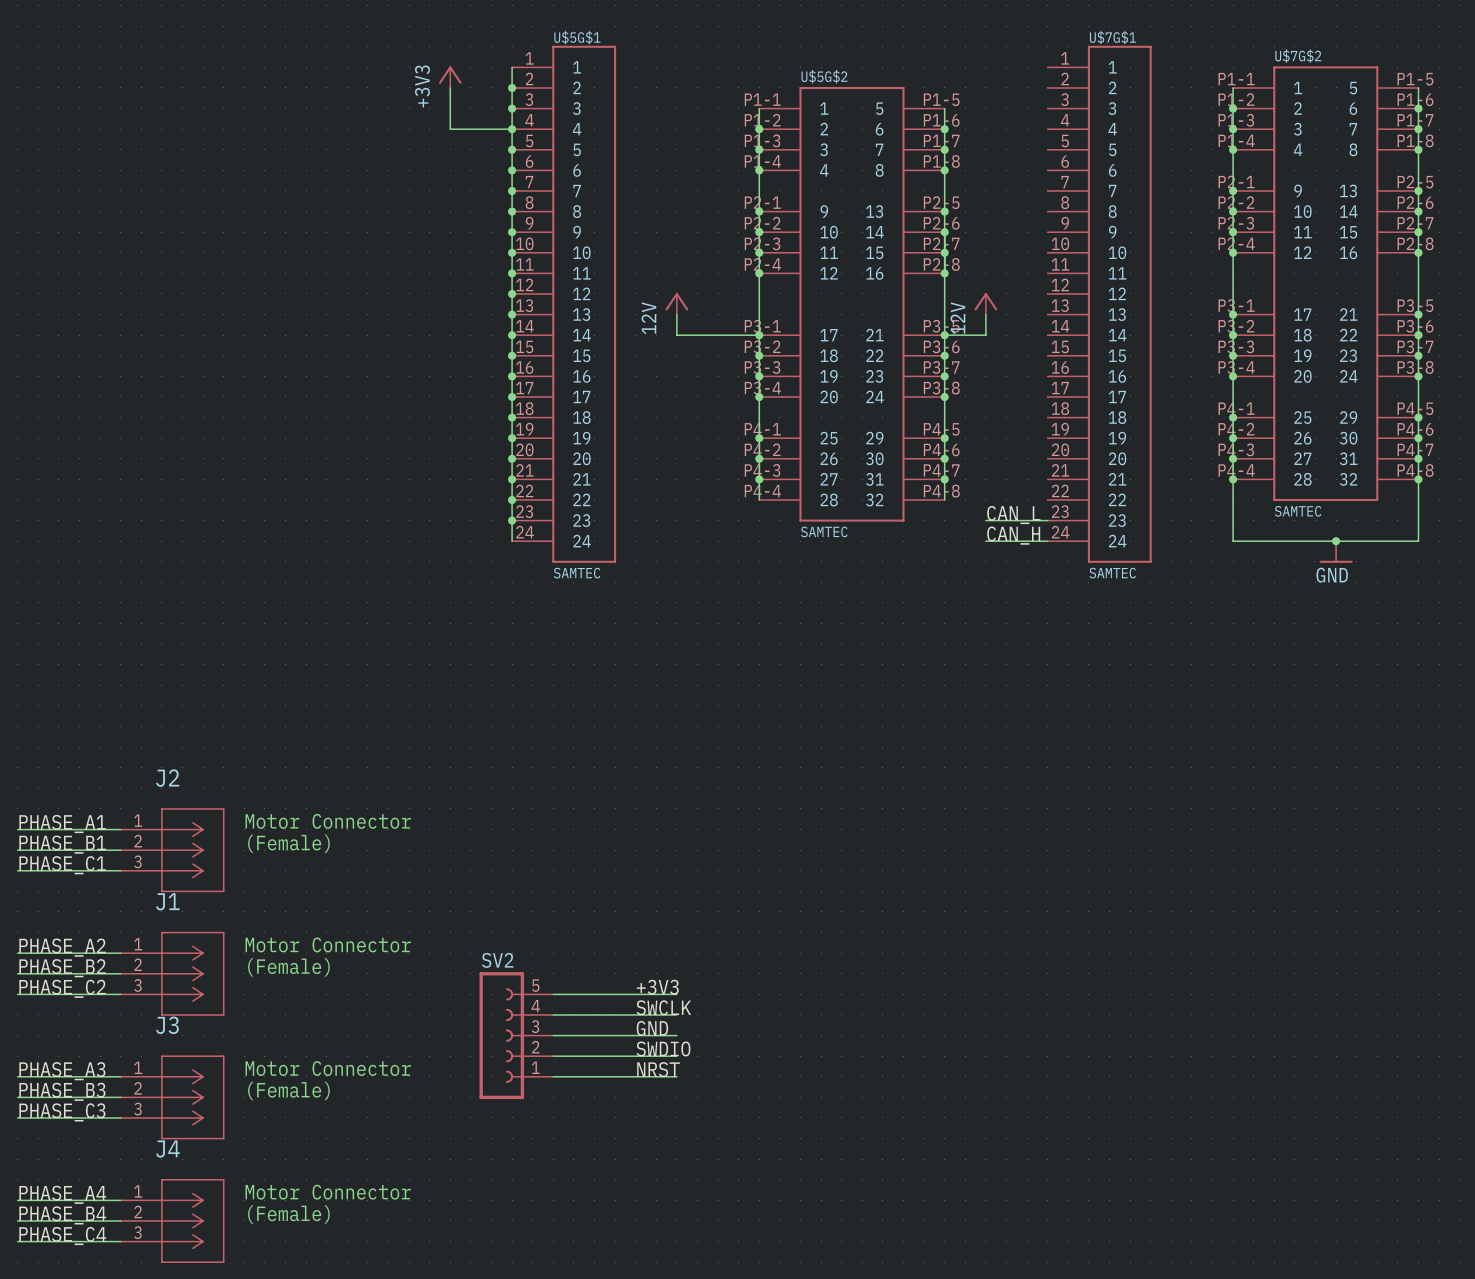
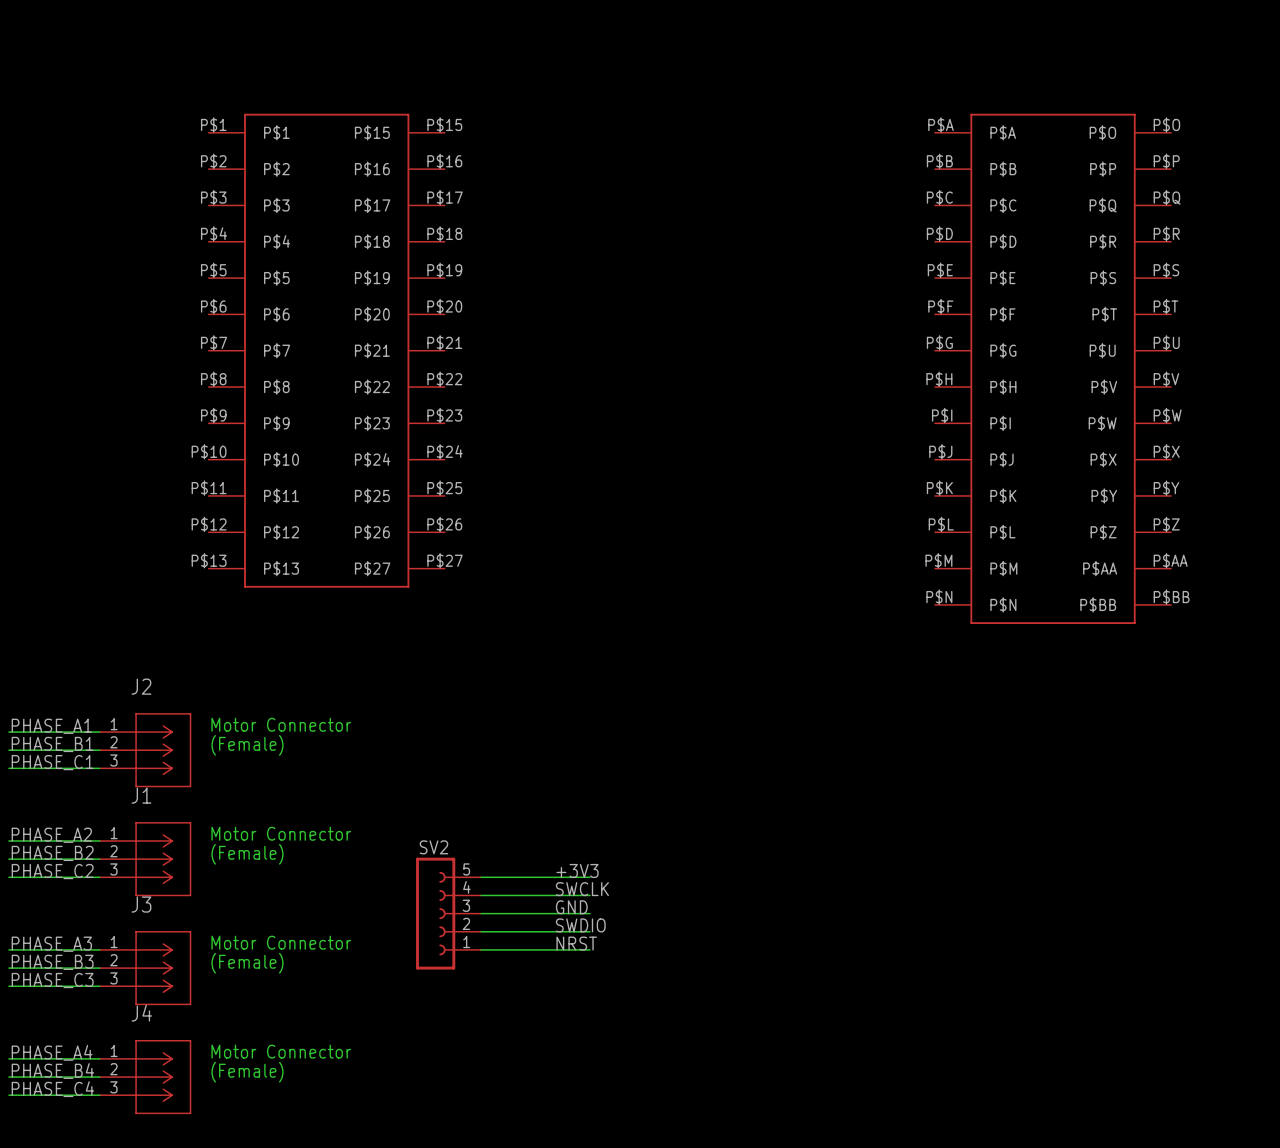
wire: (512, 67) (512, 541) -> none
power symbol: +3V3 (450, 77) -> none
wire: (450, 87) (450, 129) (512, 129) -> none
junction: (512, 87) -> none
wire: (1233, 87) (1233, 541) (1418, 541) (1418, 87) -> none
junction: (512, 108) -> none
wire: (759, 108) (759, 499) -> none
wire: (944, 108) (944, 499) -> none
junction: (1233, 108) -> none
junction: (1418, 108) -> none
junction: (512, 129) -> none
junction: (759, 129) -> none
junction: (944, 129) -> none
junction: (1233, 129) -> none
junction: (1418, 129) -> none
junction: (512, 149) -> none
junction: (759, 149) -> none
junction: (944, 149) -> none
junction: (1233, 149) -> none
junction: (1418, 149) -> none
junction: (512, 170) -> none
junction: (759, 170) -> none
junction: (944, 170) -> none
junction: (512, 190) -> none
junction: (1233, 190) -> none
junction: (1418, 190) -> none
junction: (512, 211) -> none
junction: (759, 211) -> none
junction: (944, 211) -> none
junction: (1233, 211) -> none
junction: (1418, 211) -> none
junction: (512, 232) -> none
junction: (759, 232) -> none
junction: (944, 232) -> none
junction: (1233, 232) -> none
junction: (1418, 232) -> none
junction: (512, 252) -> none
junction: (759, 252) -> none
junction: (944, 252) -> none
junction: (1233, 252) -> none
junction: (1418, 252) -> none
junction: (512, 273) -> none
junction: (759, 273) -> none
junction: (944, 273) -> none
U$7G$2: SAMTEC (1325, 283) -> none
junction: (512, 293) -> none
power symbol: 12V (676, 303) -> none
power symbol: 12V (985, 303) -> none
U$5G$1: SAMTEC (564, 304) -> none
U$5G$2: SAMTEC (851, 304) -> none
U$7G$1: SAMTEC (1099, 304) -> none
junction: (512, 314) -> none
wire: (676, 314) (676, 335) (759, 335) -> none
wire: (985, 314) (985, 335) (944, 335) -> none
junction: (1233, 314) -> none
junction: (1418, 314) -> none
junction: (512, 335) -> none
junction: (759, 335) -> none
junction: (944, 335) -> none
junction: (1233, 335) -> none
junction: (1418, 335) -> none
junction: (512, 355) -> none
junction: (759, 355) -> none
junction: (944, 355) -> none
junction: (1233, 355) -> none
junction: (1418, 355) -> none
junction: (512, 376) -> none
junction: (759, 376) -> none
junction: (944, 376) -> none
junction: (1233, 376) -> none
junction: (1418, 376) -> none
part: none -> (326, 350)
junction: (512, 396) -> none
junction: (759, 396) -> none
junction: (944, 396) -> none
junction: (512, 417) -> none
part: none -> (1053, 368)
junction: (1233, 417) -> none
junction: (1418, 417) -> none
junction: (512, 438) -> none
junction: (759, 438) -> none
junction: (944, 438) -> none
junction: (1233, 438) -> none
junction: (1418, 438) -> none
junction: (512, 458) -> none
junction: (759, 458) -> none
junction: (944, 458) -> none
junction: (1233, 458) -> none
junction: (1418, 458) -> none
junction: (512, 479) -> none
junction: (759, 479) -> none
junction: (944, 479) -> none
junction: (1233, 479) -> none
junction: (1418, 479) -> none
junction: (512, 499) -> none
label: CAN_L (1013, 515) -> none
junction: (512, 520) -> none
wire: (985, 520) (1047, 520) -> none
label: CAN_H (1013, 535) -> none
wire: (985, 541) (1047, 541) -> none
junction: (1336, 541) -> none
power symbol: GND (1336, 552) -> none

